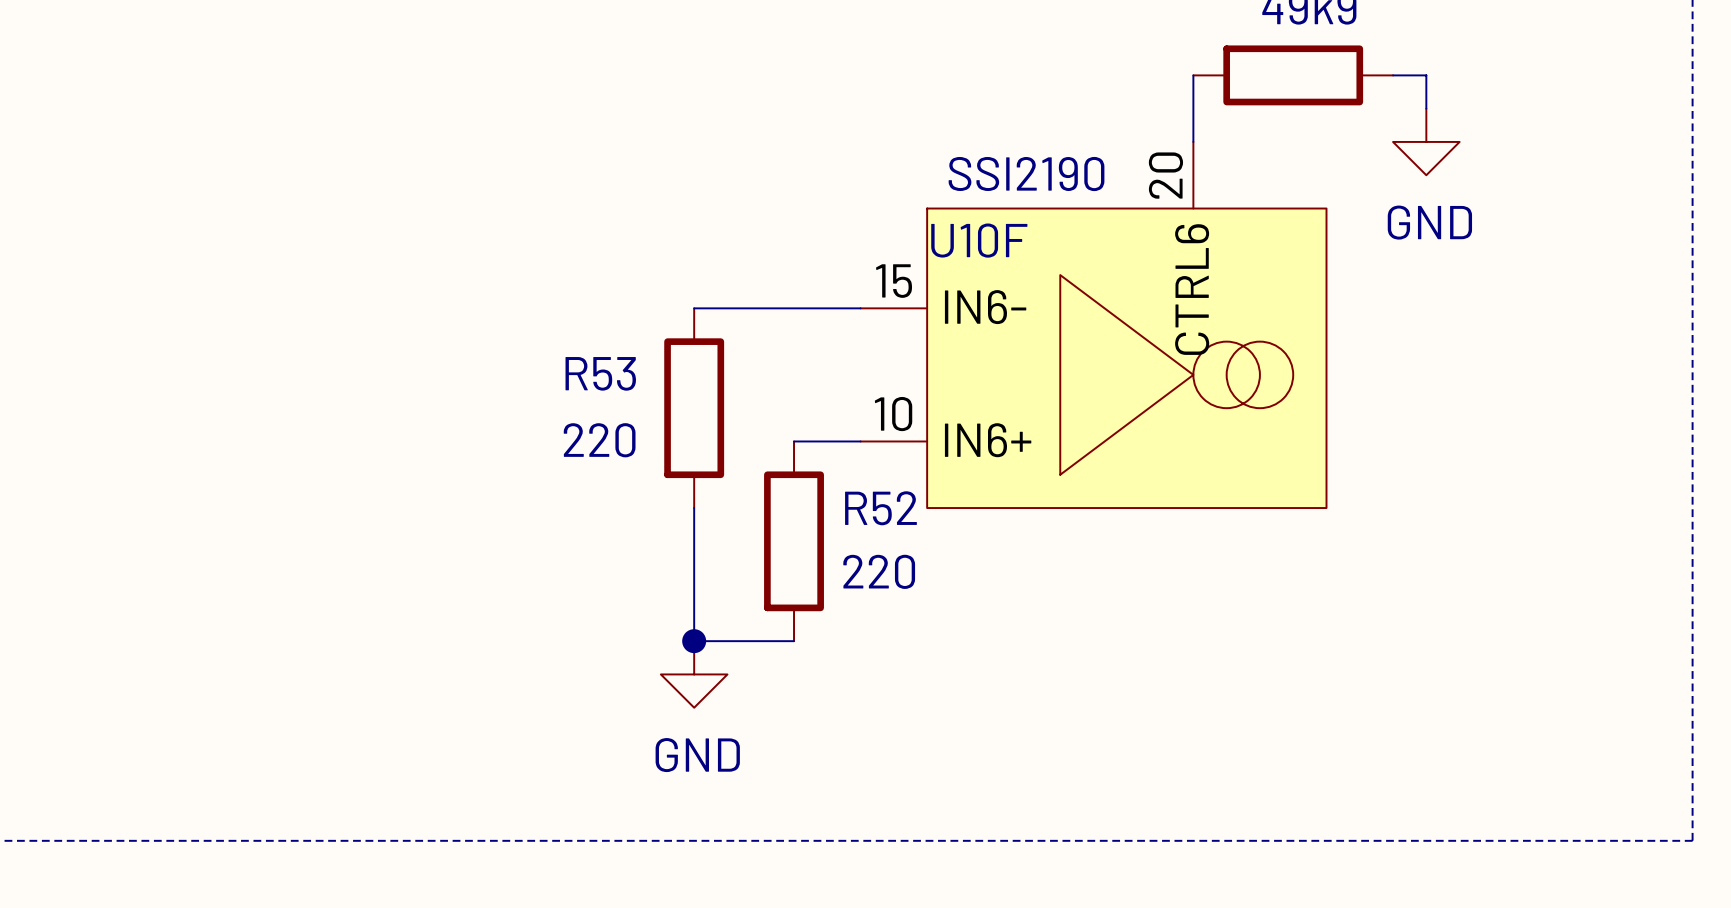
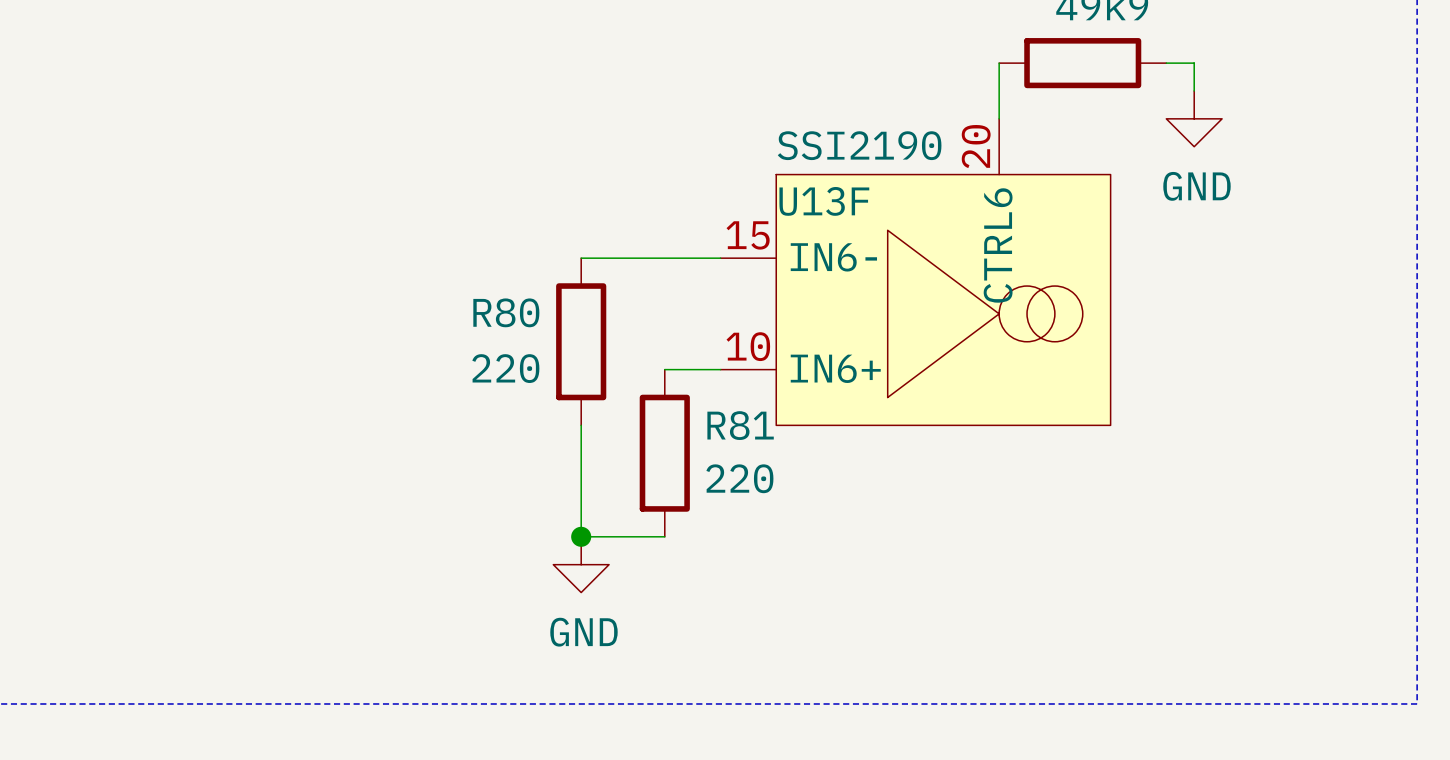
U10F name: U10F (979, 240) -> U13F (824, 201)
R53 name: R53 (600, 373) -> R80 (506, 312)
R52 name: R52 (880, 508) -> R81 (740, 425)

